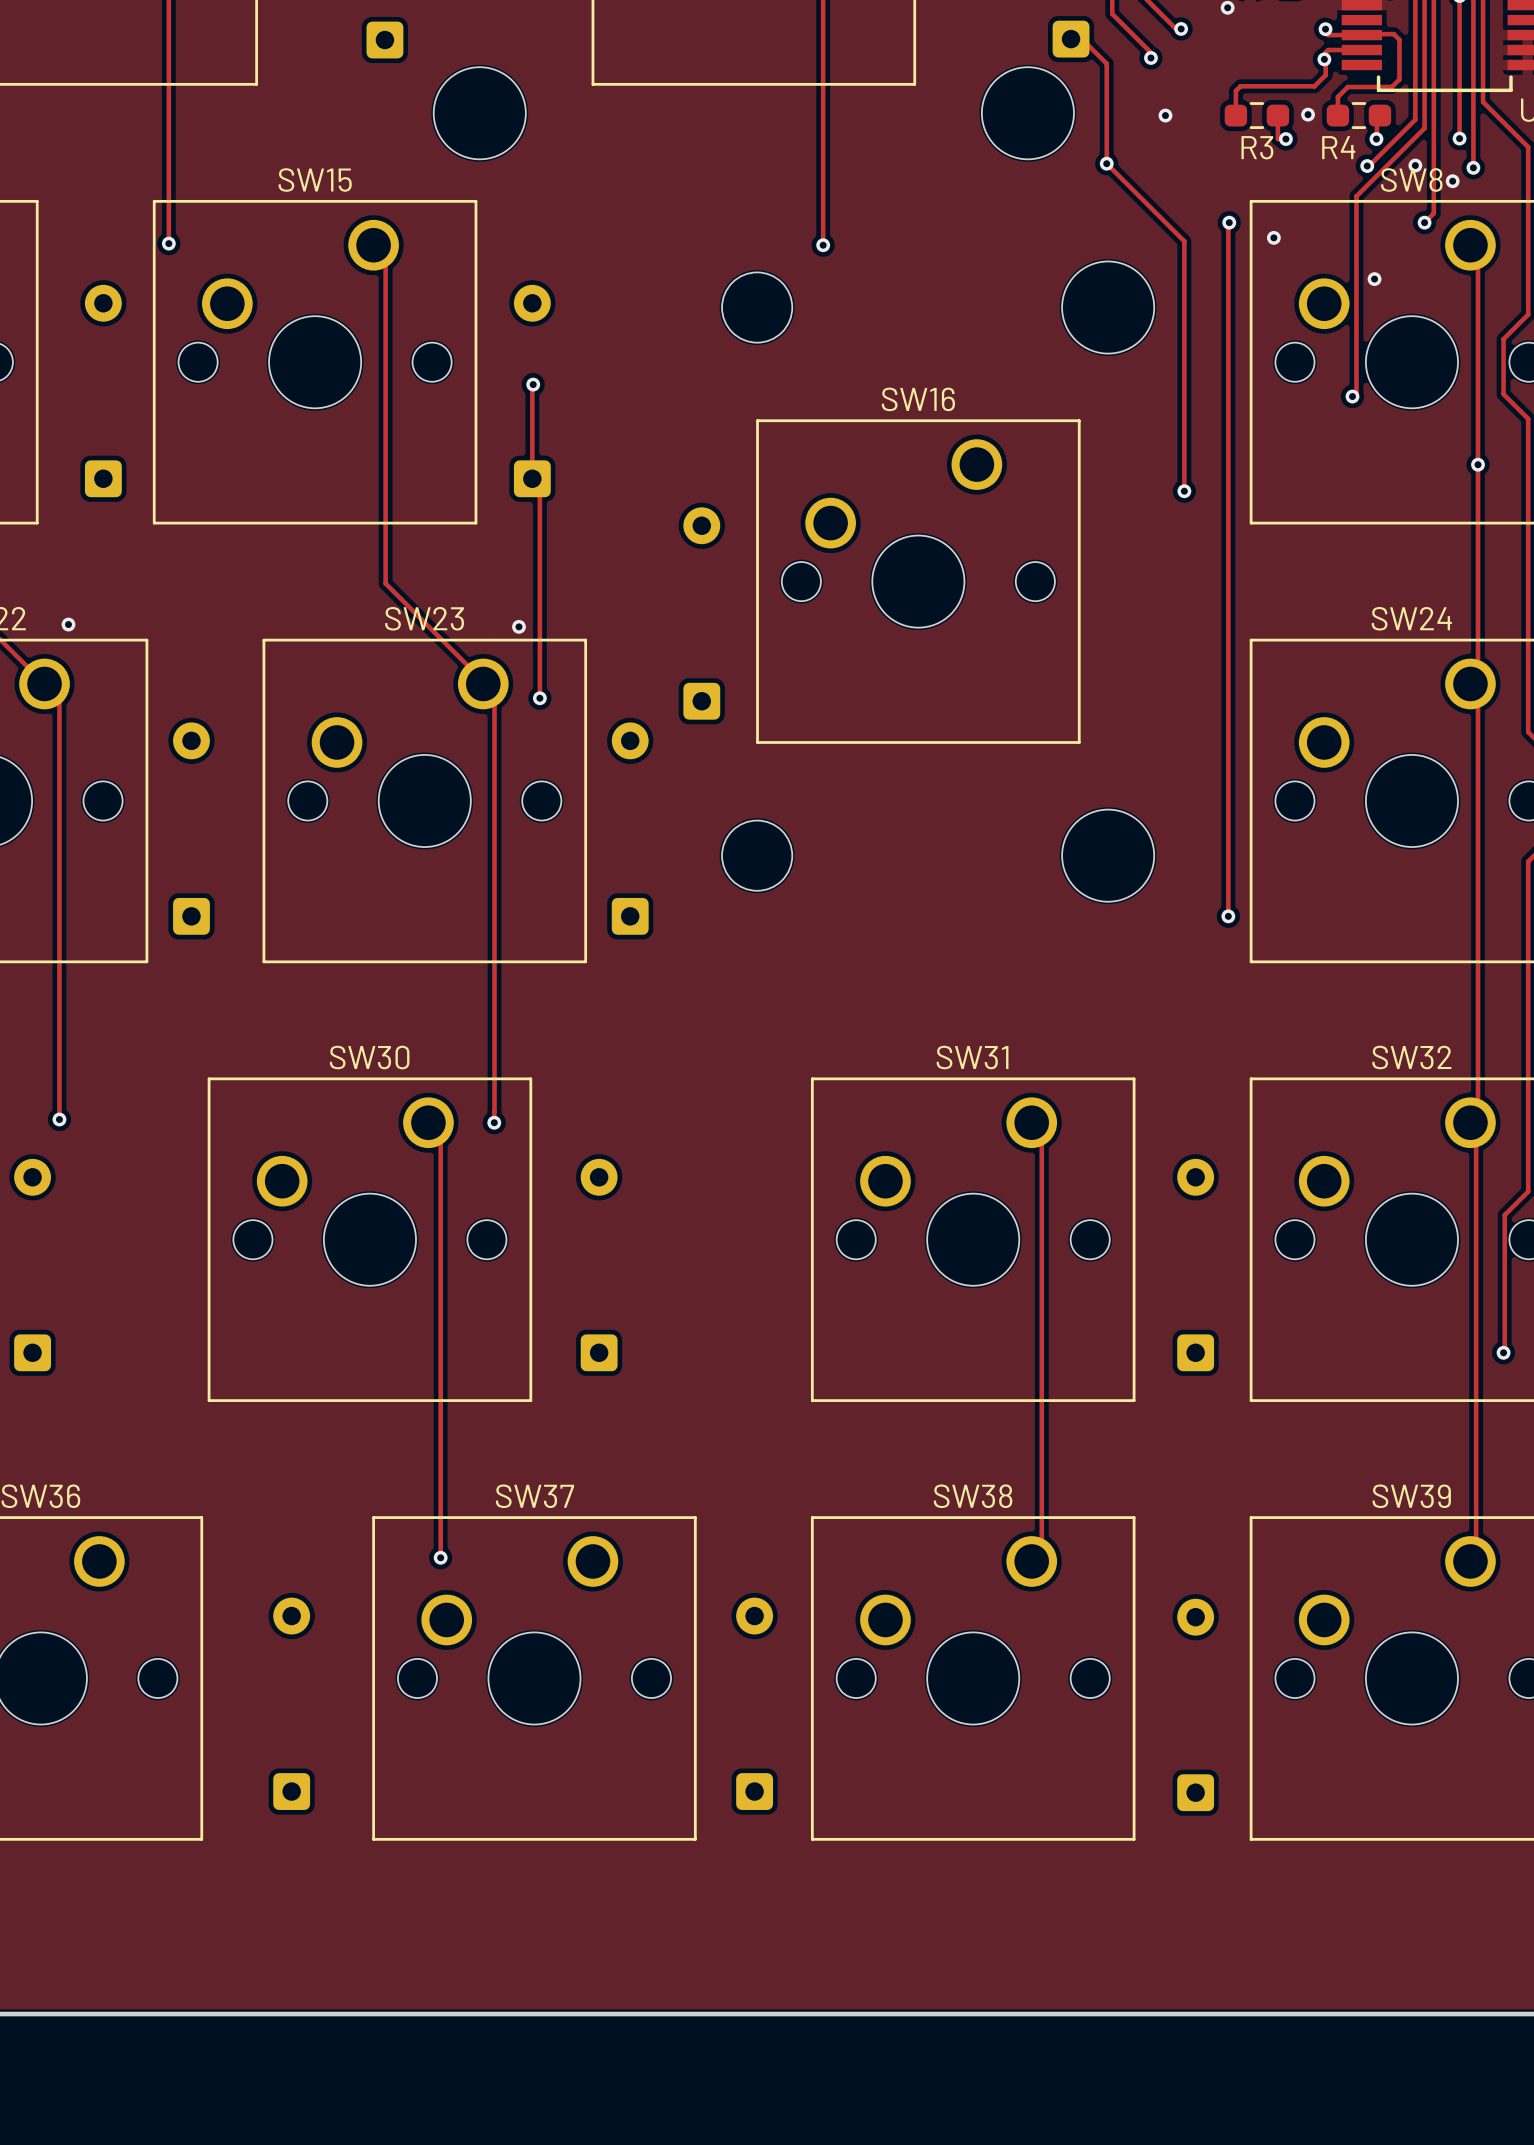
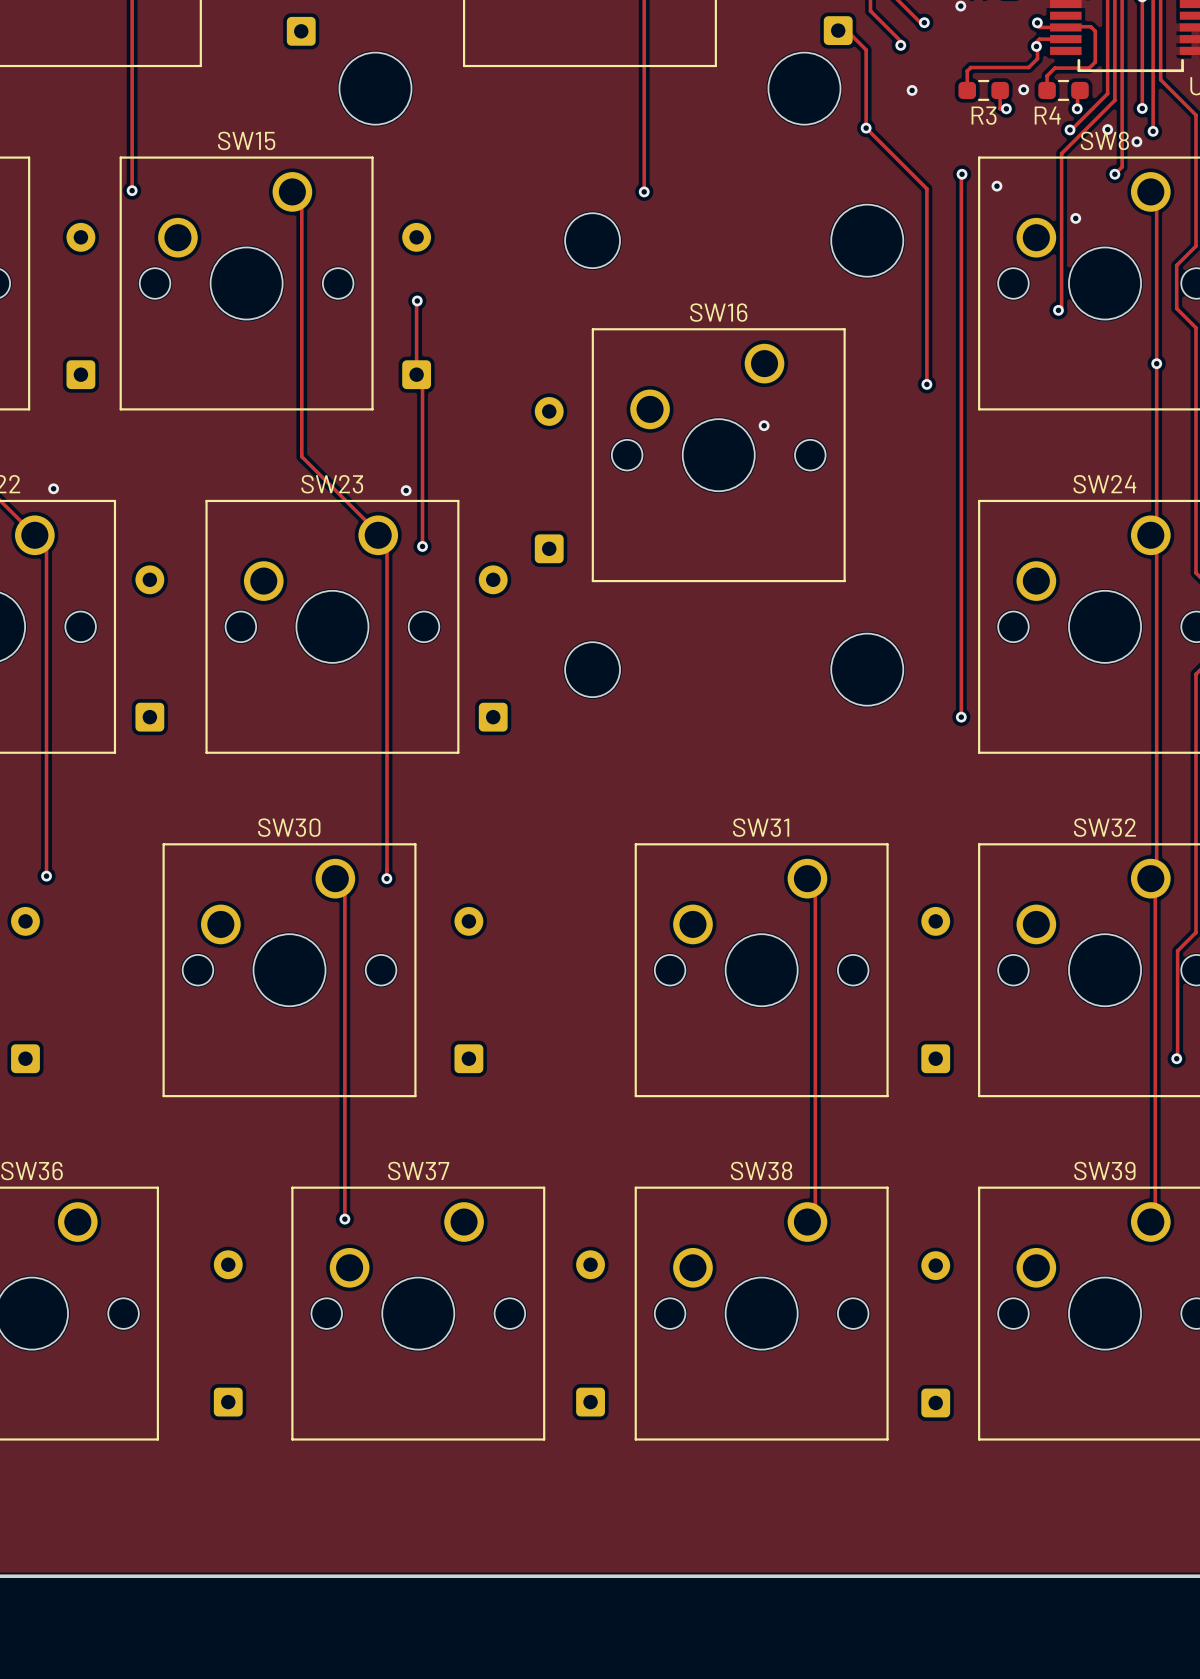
via: none -> (764, 425)

